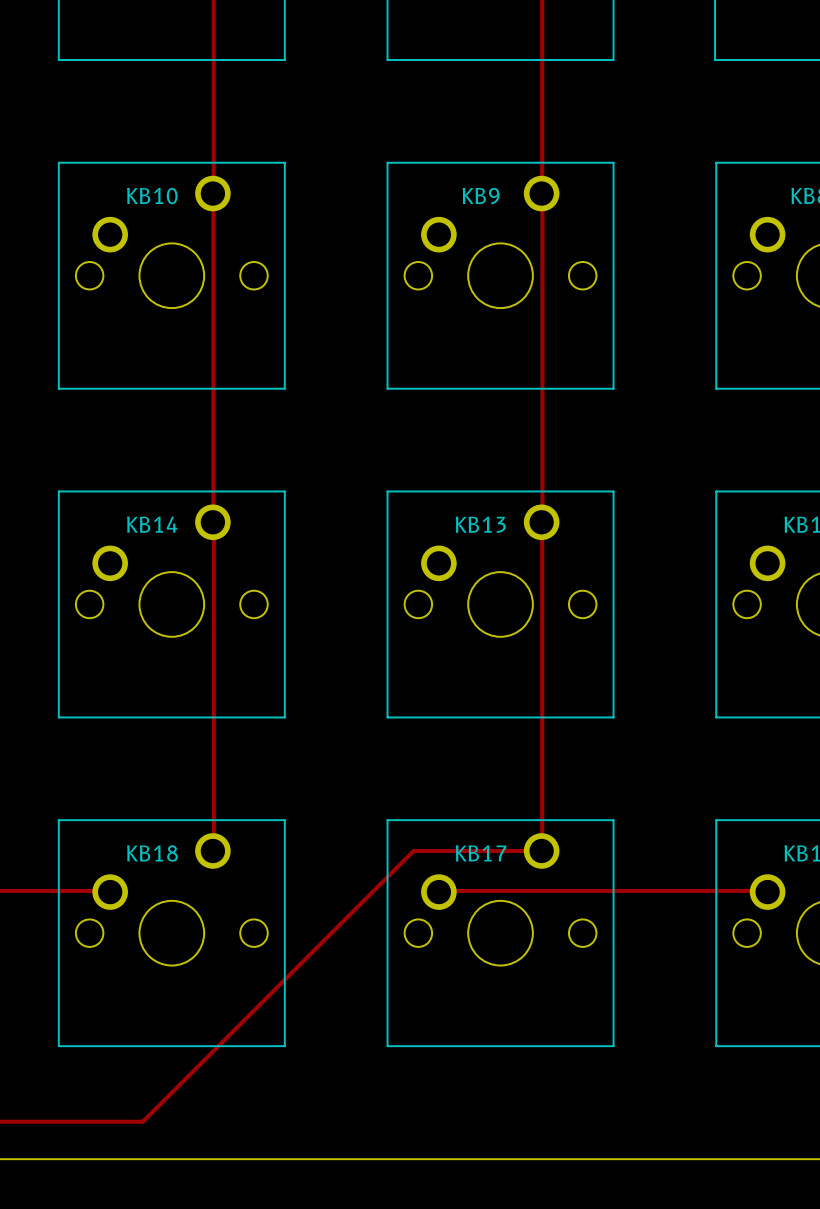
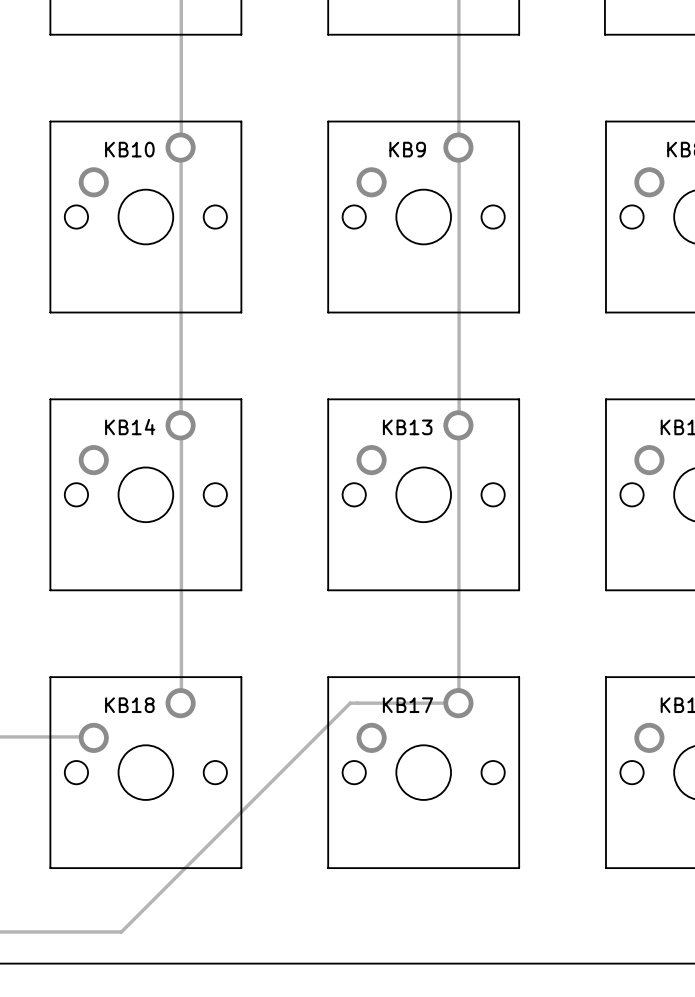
track: (438, 892) (767, 892) -> none

